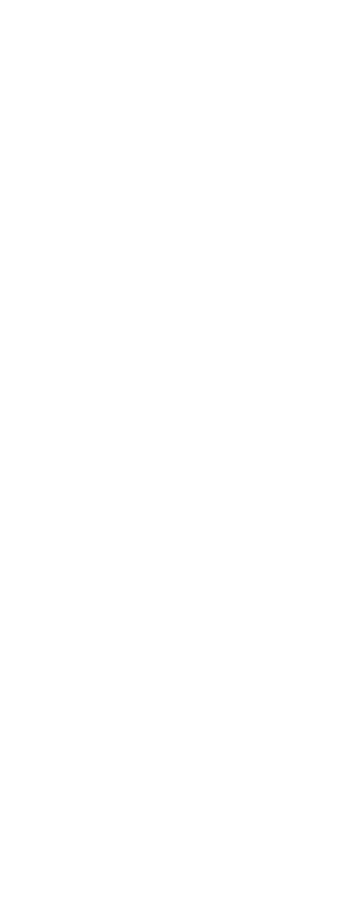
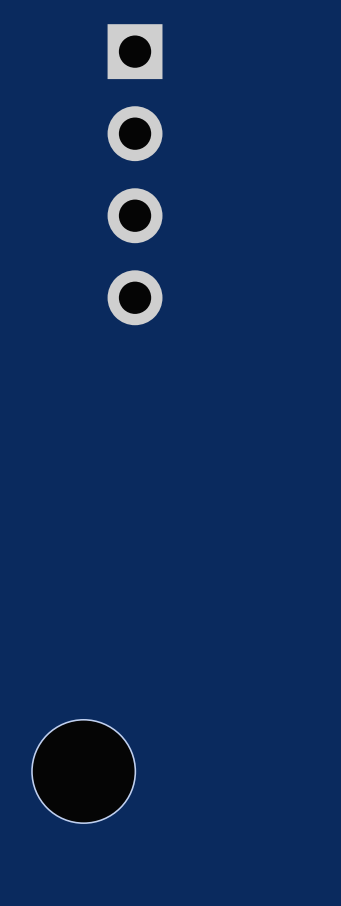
part: none -> (135, 174)
part: none -> (83, 771)

